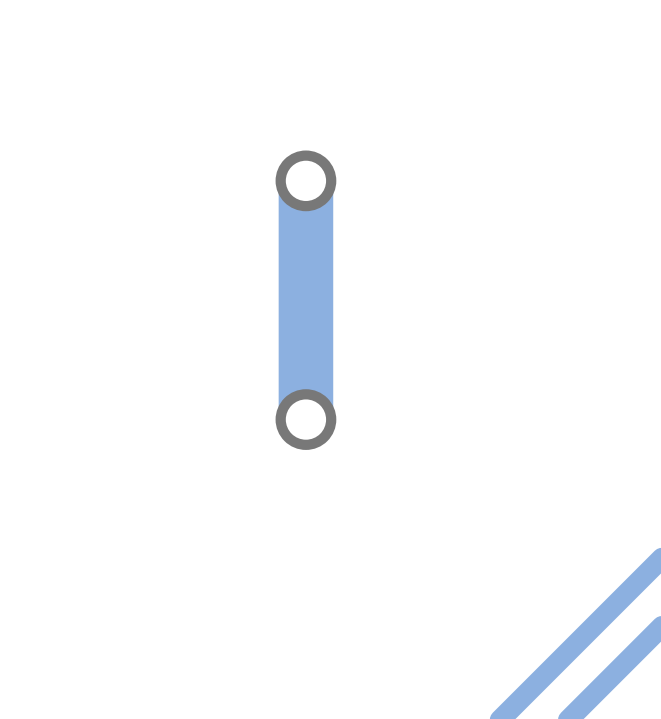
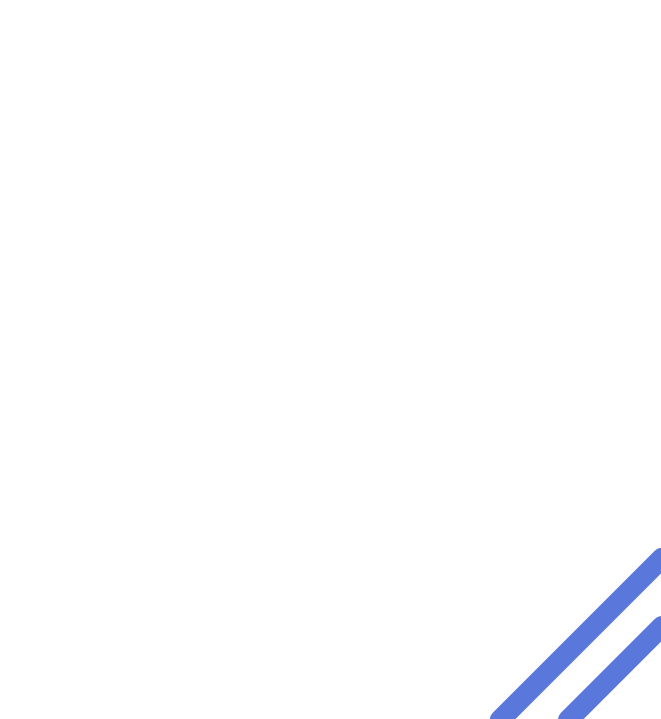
track: (305, 180) (305, 419) -> none
via: (305, 180) -> none
via: (305, 419) -> none

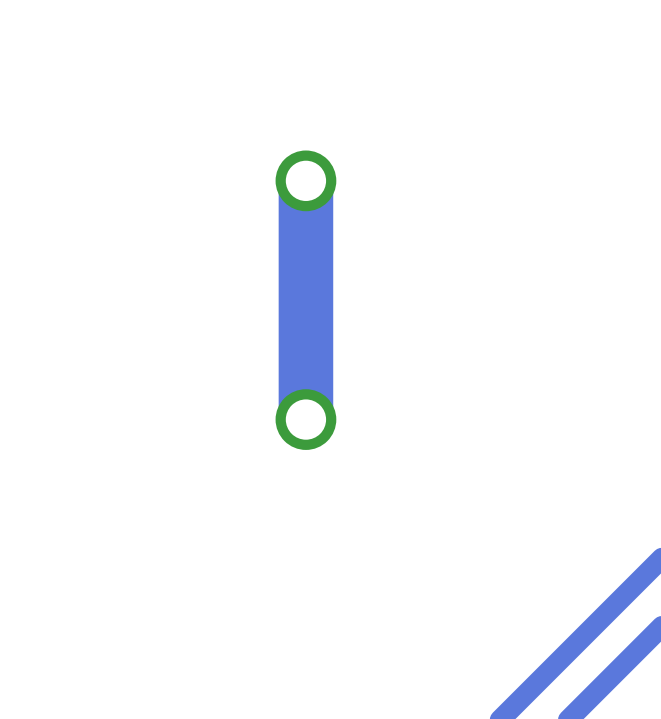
track: none -> (305, 180) (305, 419)
via: none -> (305, 180)
via: none -> (305, 419)

